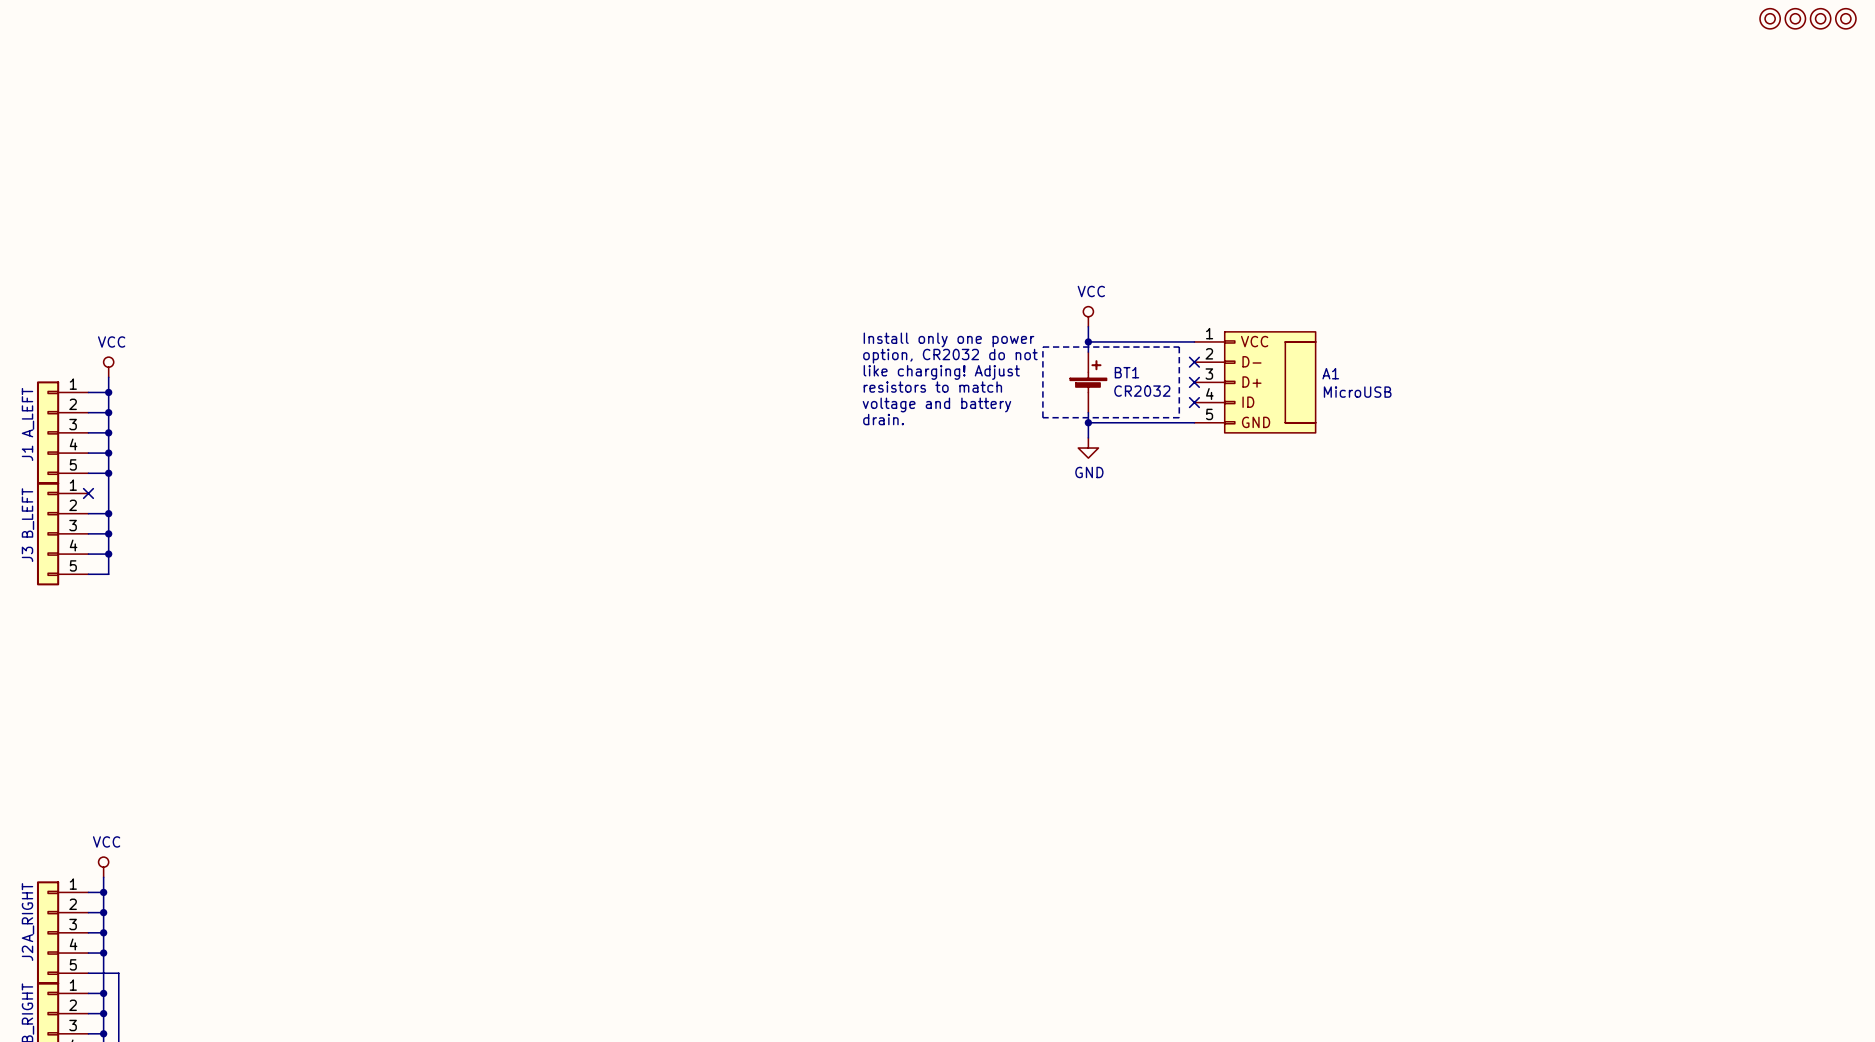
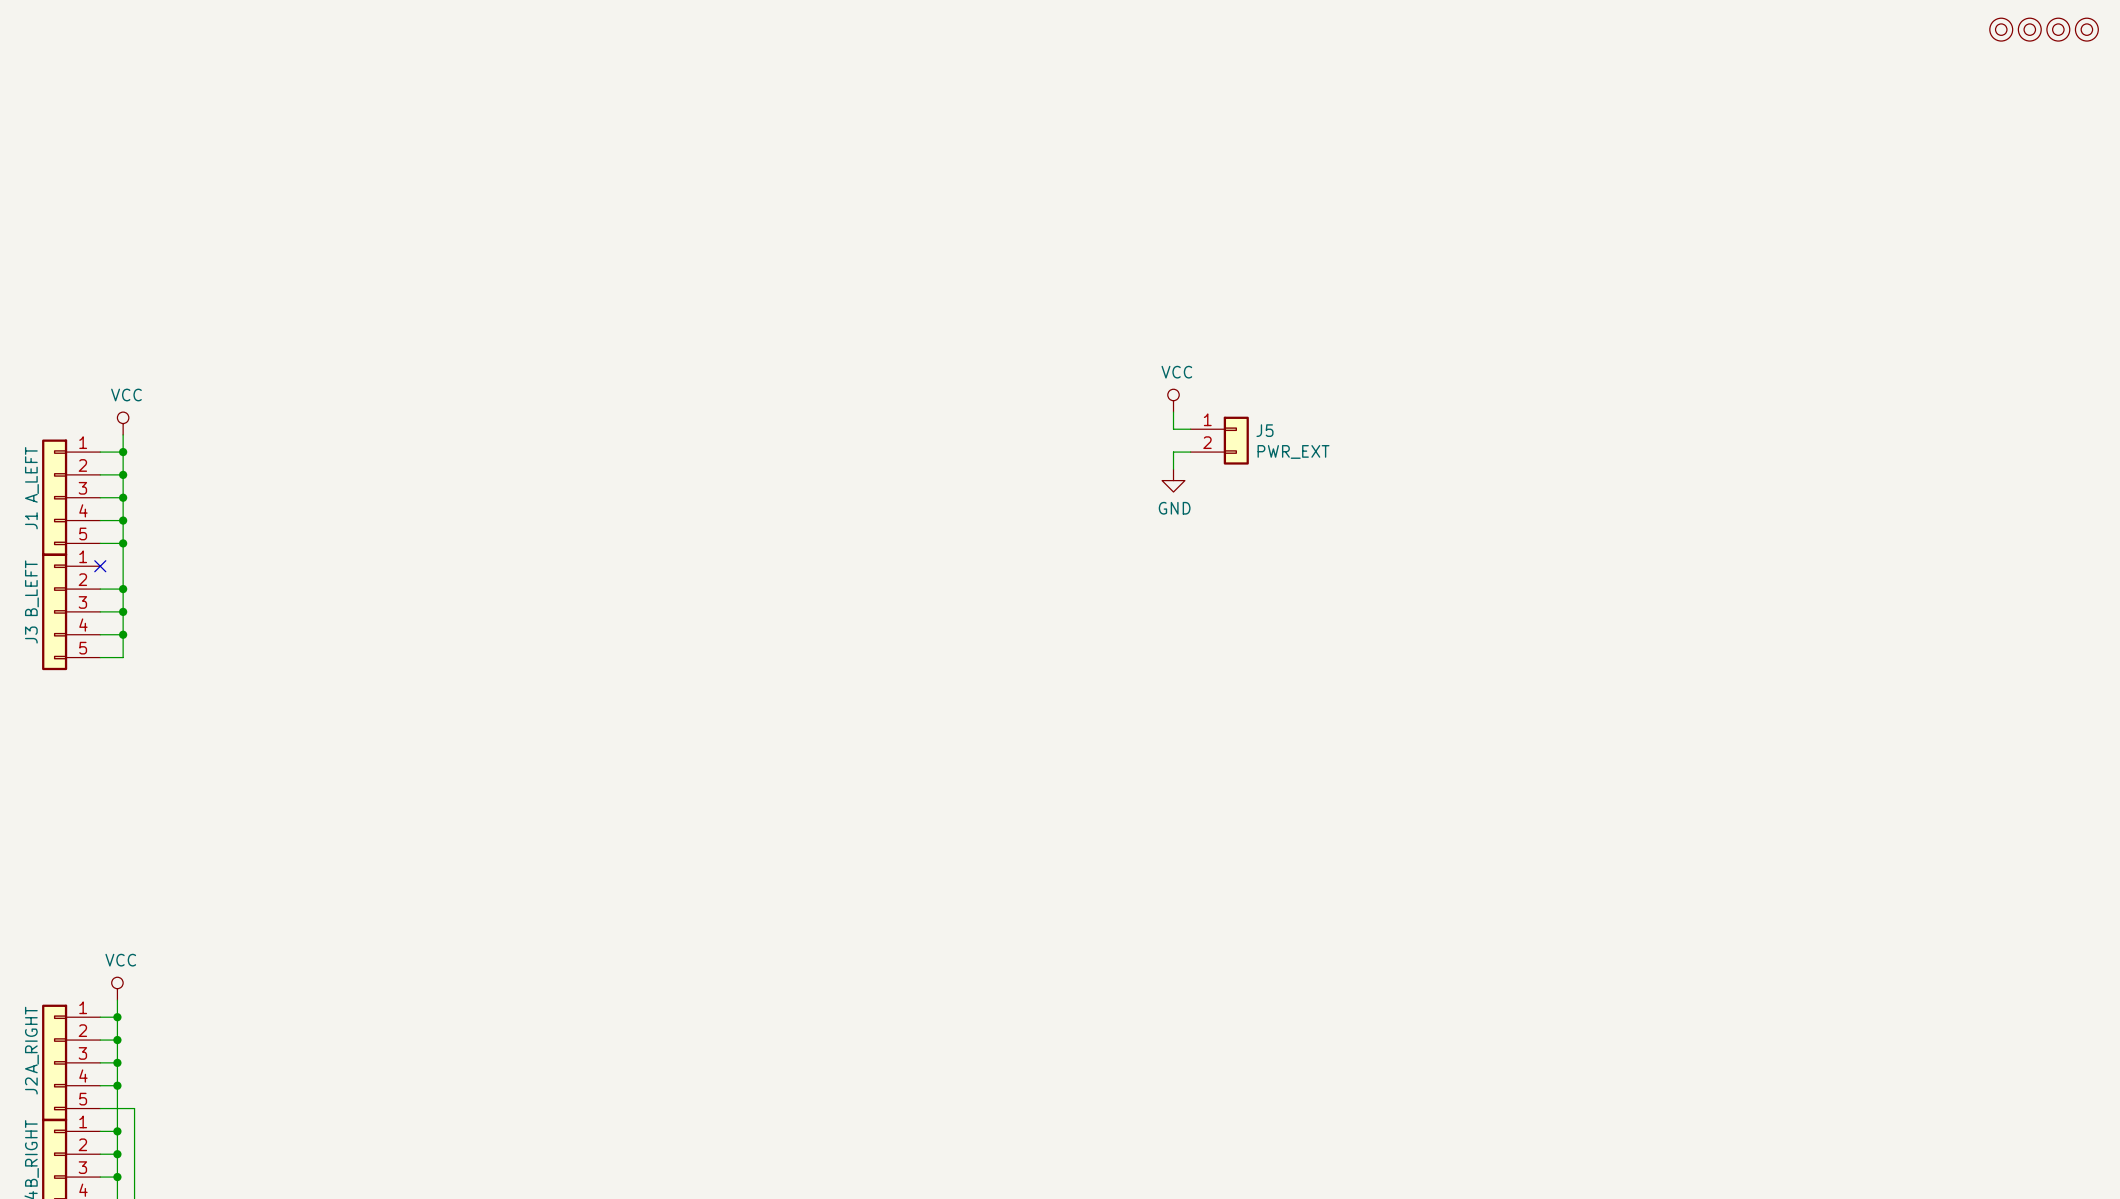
power symbol position: VCC (1088, 316) -> VCC (1173, 400)
wire: (1088, 326) (1088, 352) -> none
text: Install only one power (948, 339) -> none
wire: (1088, 341) (1194, 341) -> none
junction: (1088, 341) -> none
line: (1042, 347) (1179, 347) (1179, 417) (1042, 417) (1042, 347) -> none
text: option, CR2032 do not (950, 356) -> none
wire: none -> (1173, 412) (1173, 429) (1190, 429)
no-connect mark: (1194, 362) -> none
text: like charging! Adjust (941, 372) -> none
J5: none -> PWR_EXT (1219, 440)
BT1: CR2032 (1088, 382) -> none
no-connect mark: (1194, 382) -> none
A1: MicroUSB (1255, 382) -> none
text: resistors to match (932, 387) -> none
wire: none -> (1190, 452) (1173, 452) (1173, 469)
no-connect mark: (1194, 402) -> none
text: voltage and battery (936, 404) -> none
wire: (1088, 412) (1088, 437) -> none
text: drain. (883, 419) -> none
wire: (1088, 422) (1194, 422) -> none
junction: (1088, 422) -> none
power symbol position: GND (1088, 448) -> GND (1173, 480)

